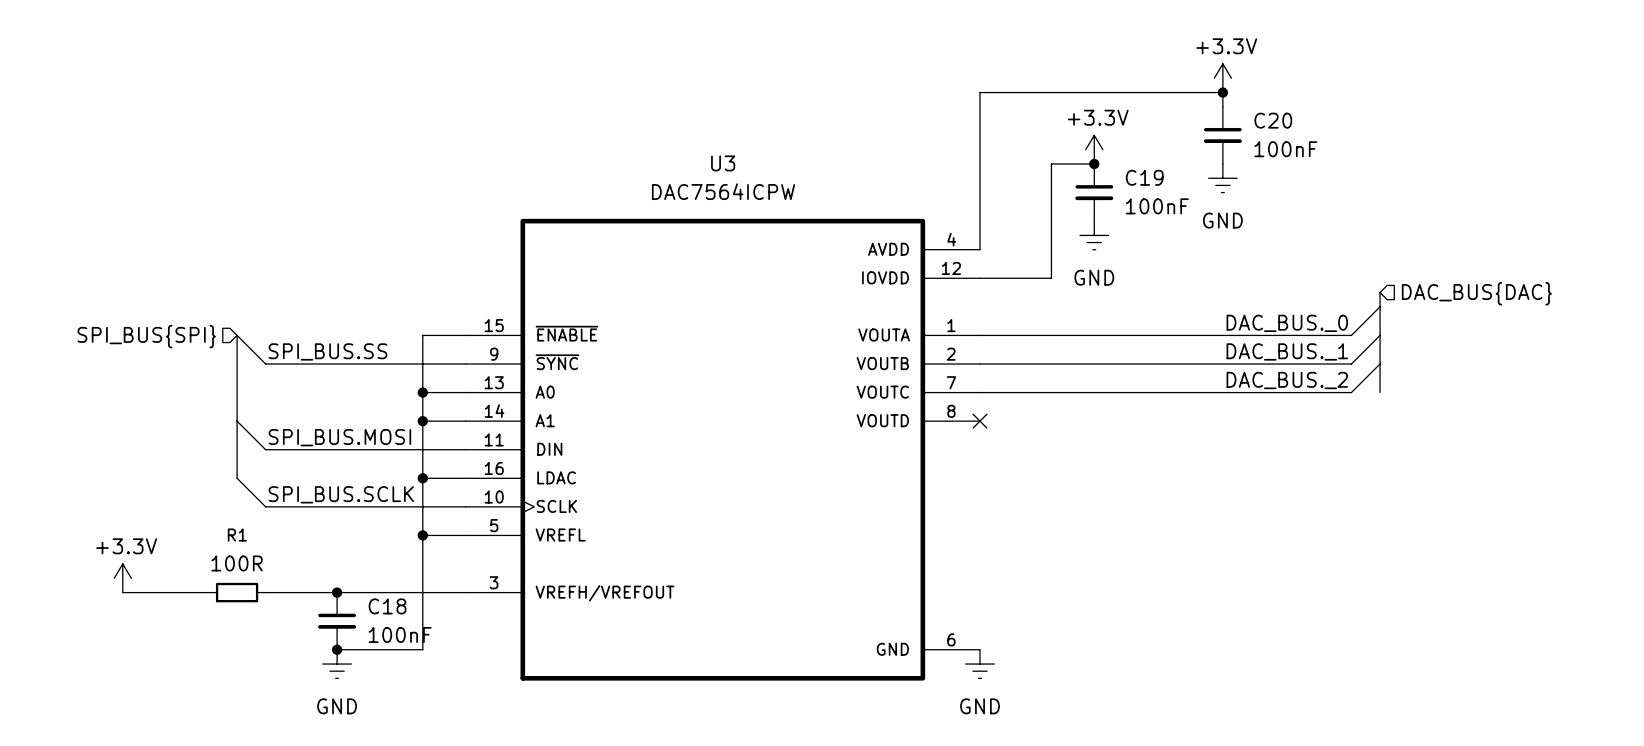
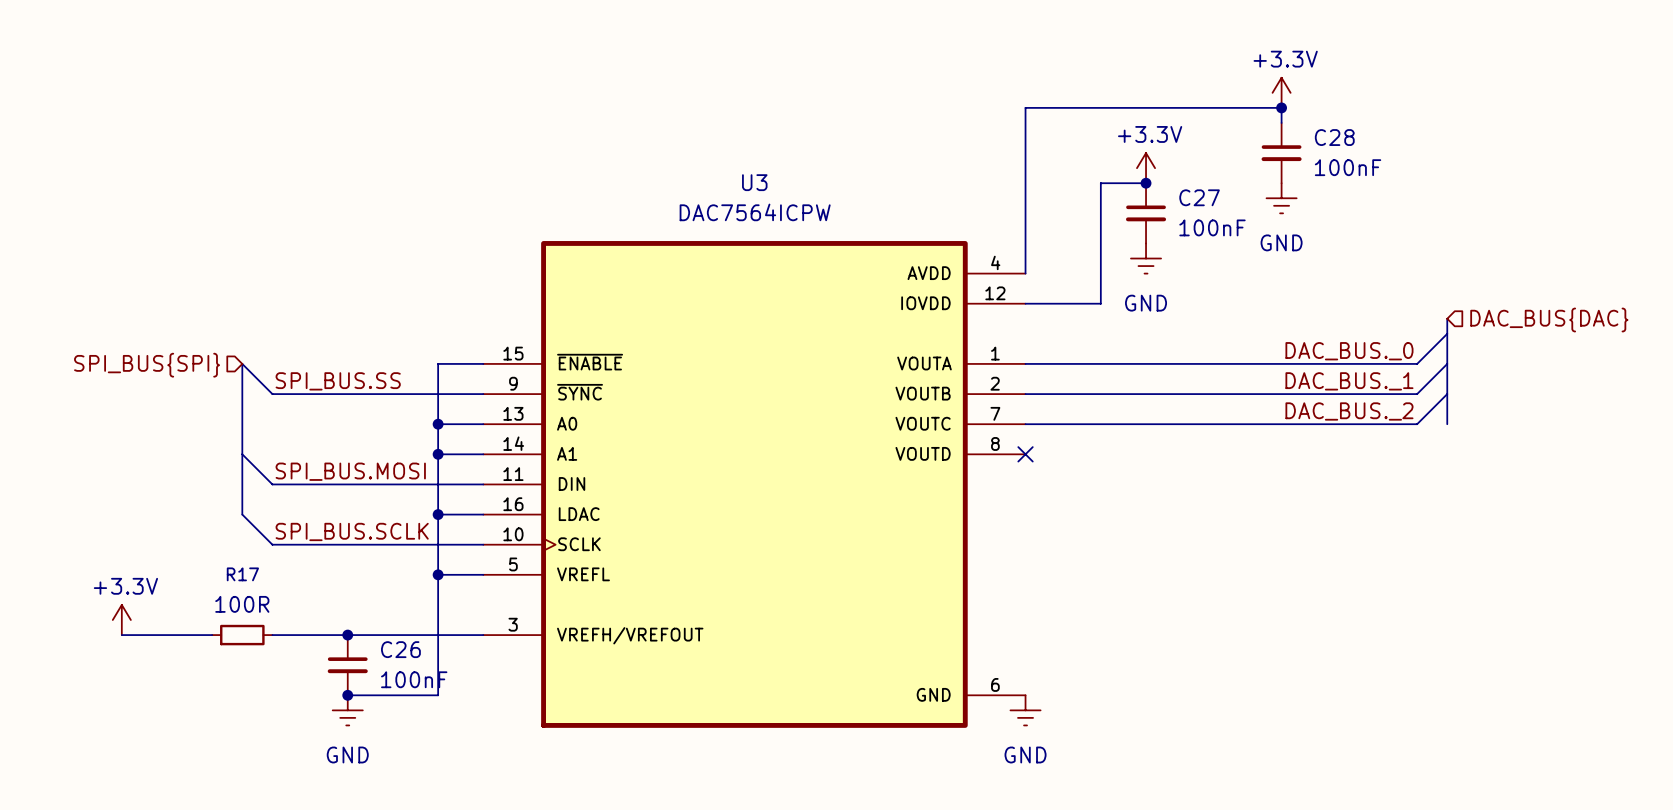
C20 name: C20 (1273, 120) -> C28 (1334, 137)
C19 name: C19 (1144, 177) -> C27 (1199, 197)
R1 name: R1 (237, 535) -> R17 (242, 574)
C18 name: C18 (387, 606) -> C26 (400, 649)

